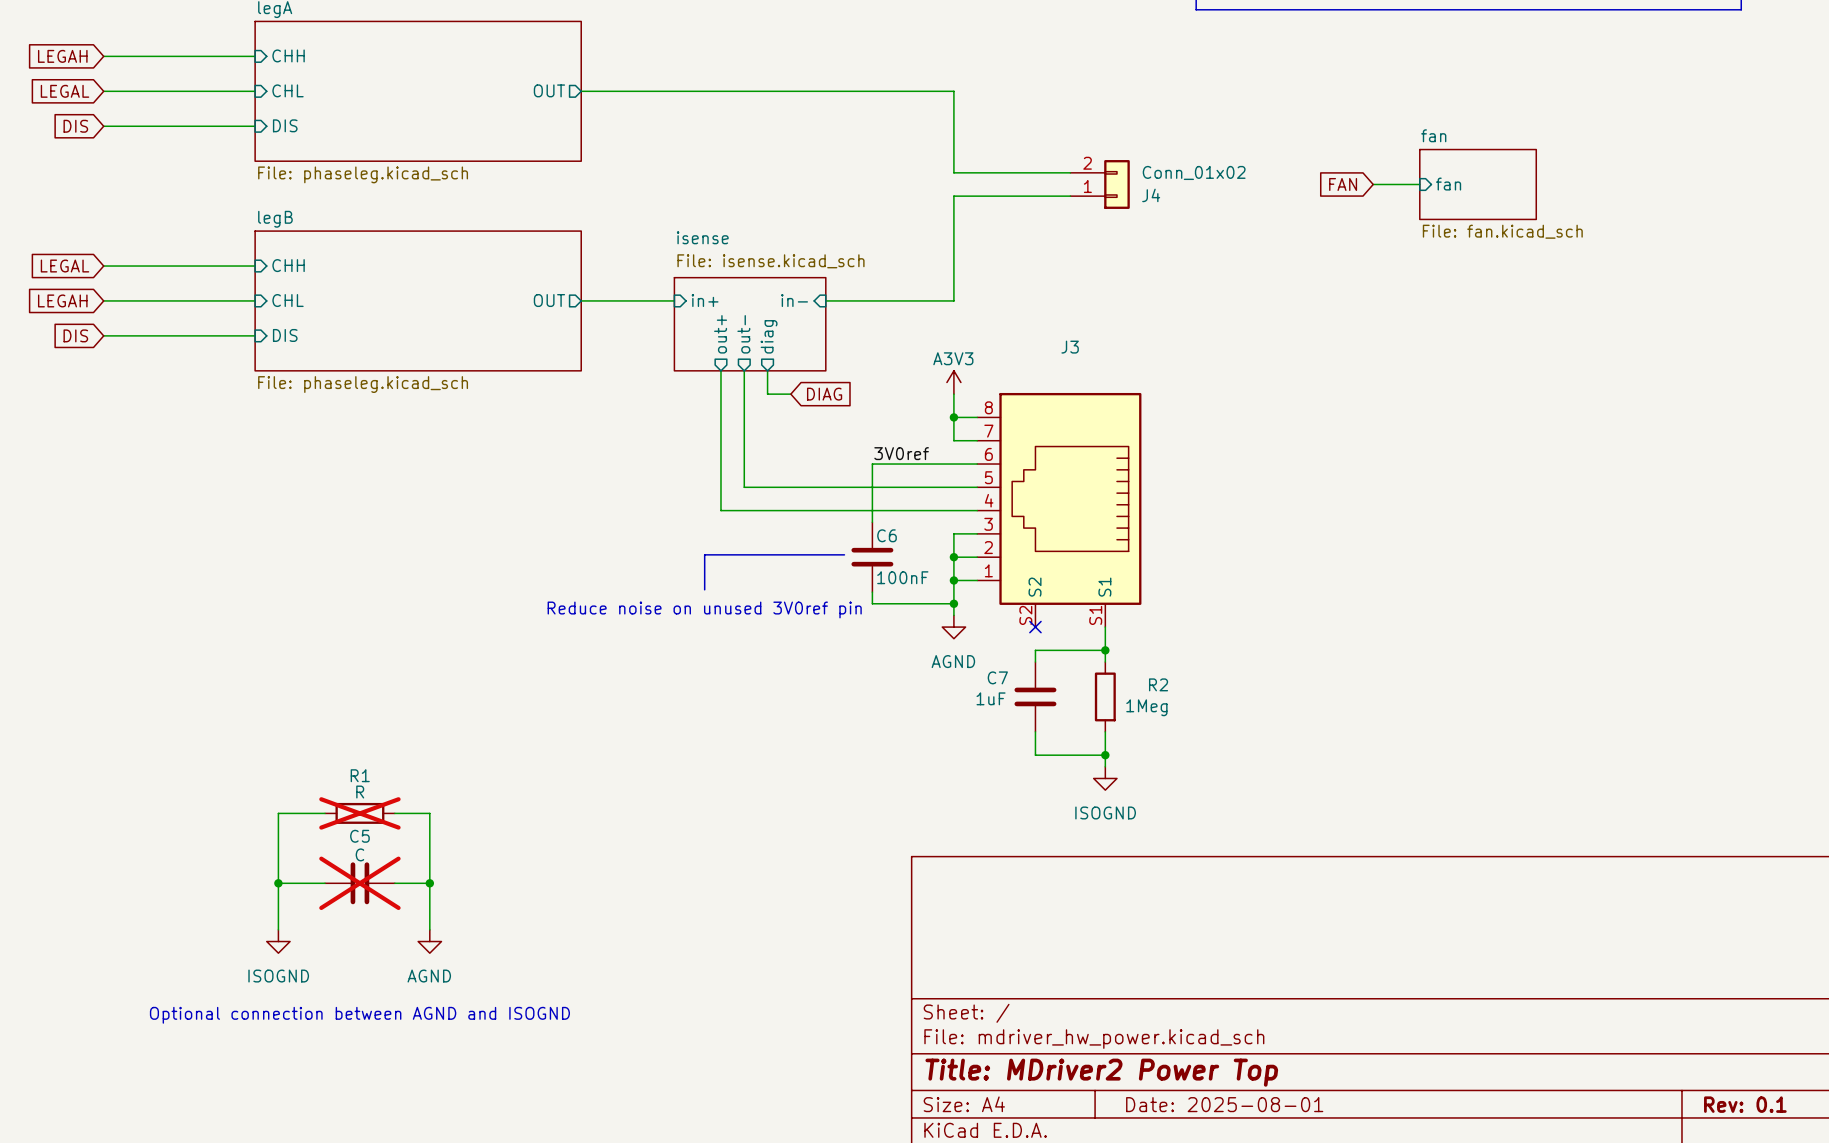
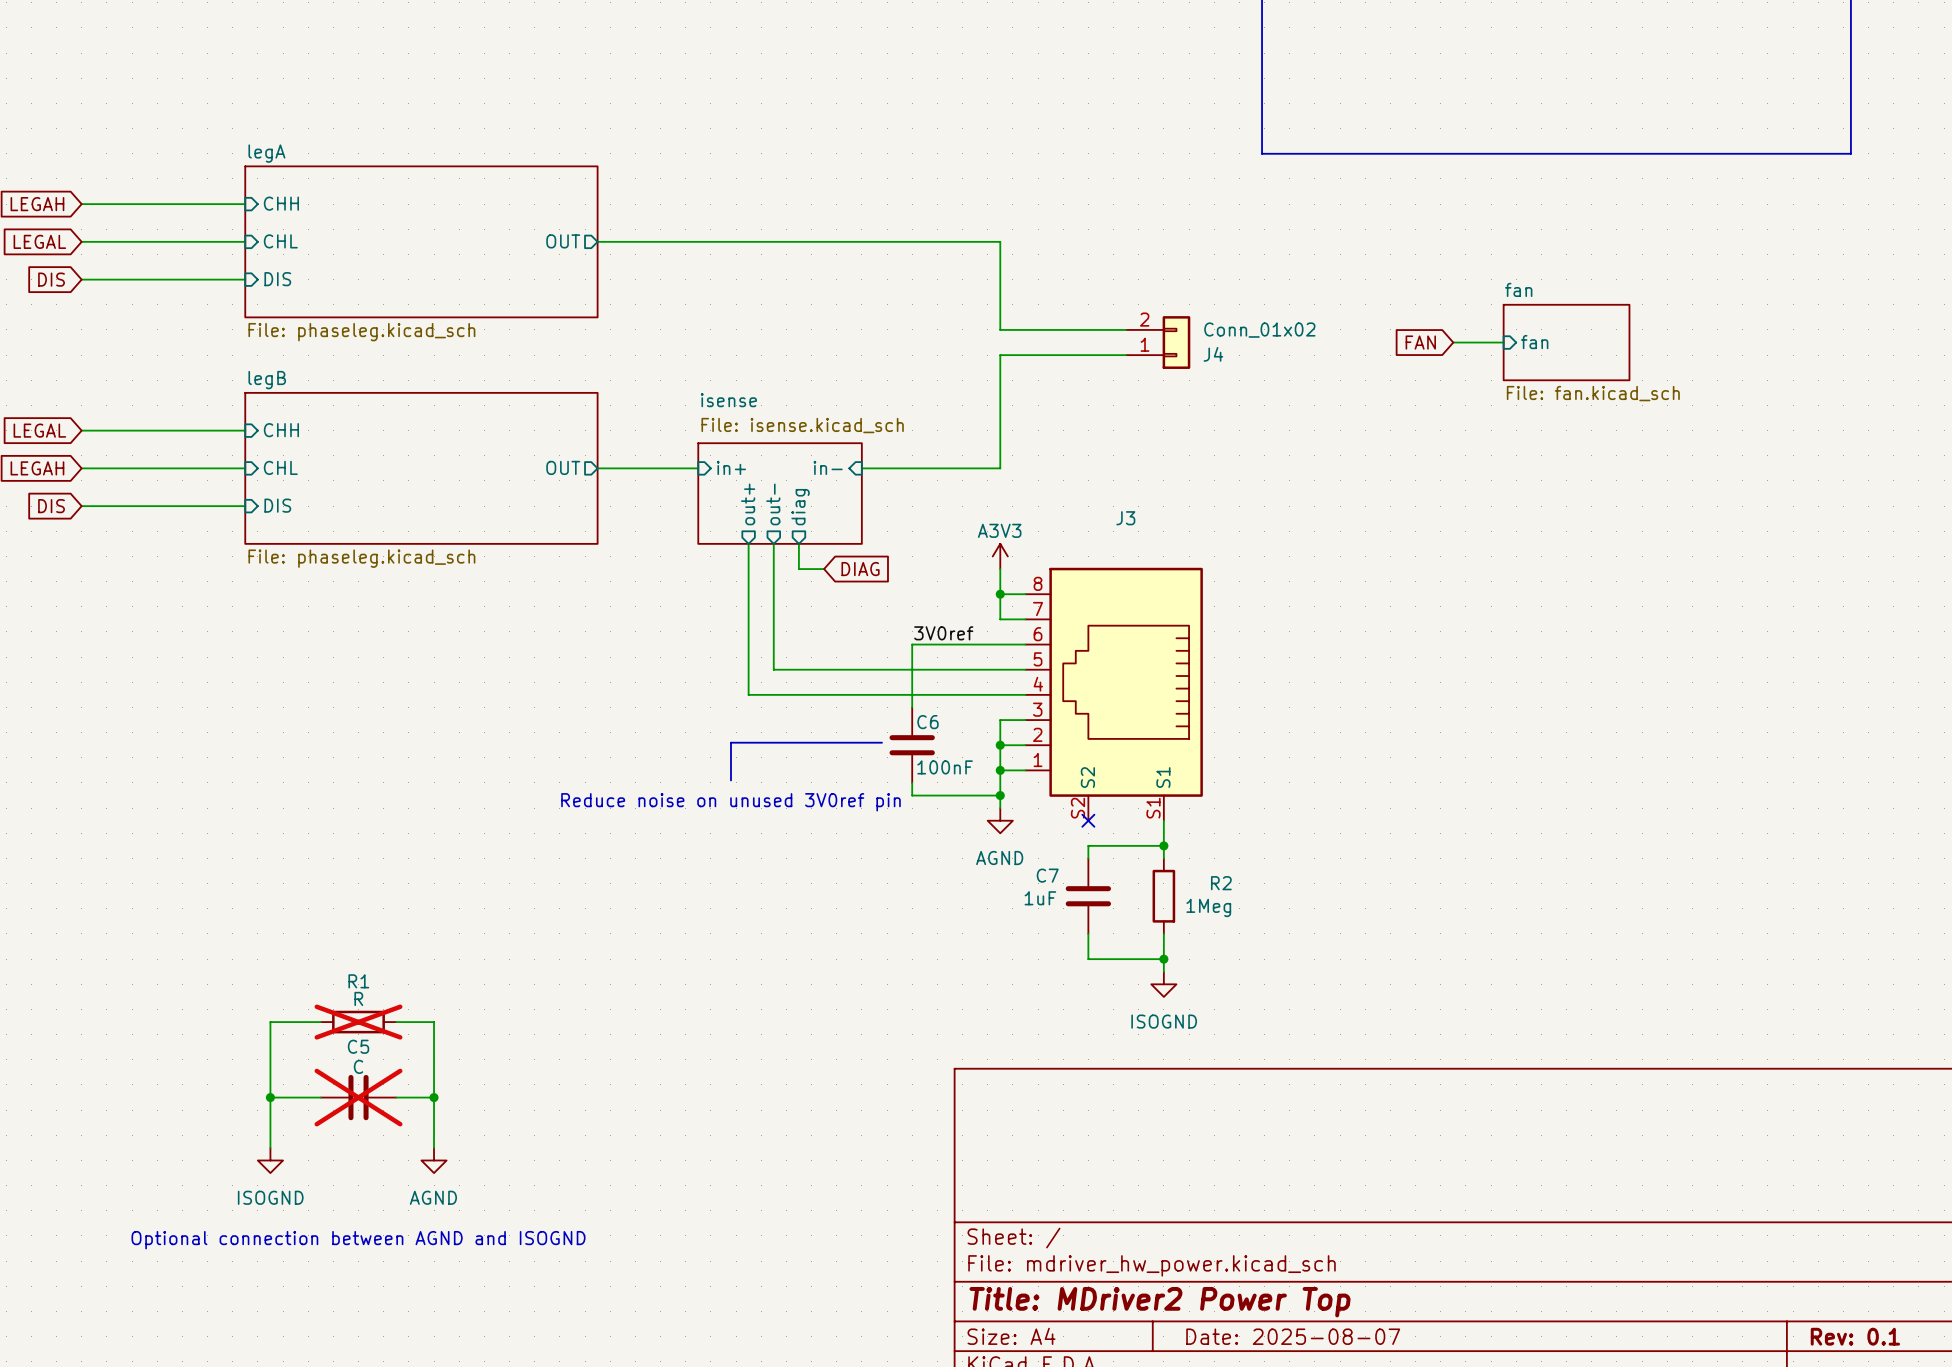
title block: Date: 2025-08-01 (1224, 1104) -> Date: 2025-08-07 (1293, 1336)

